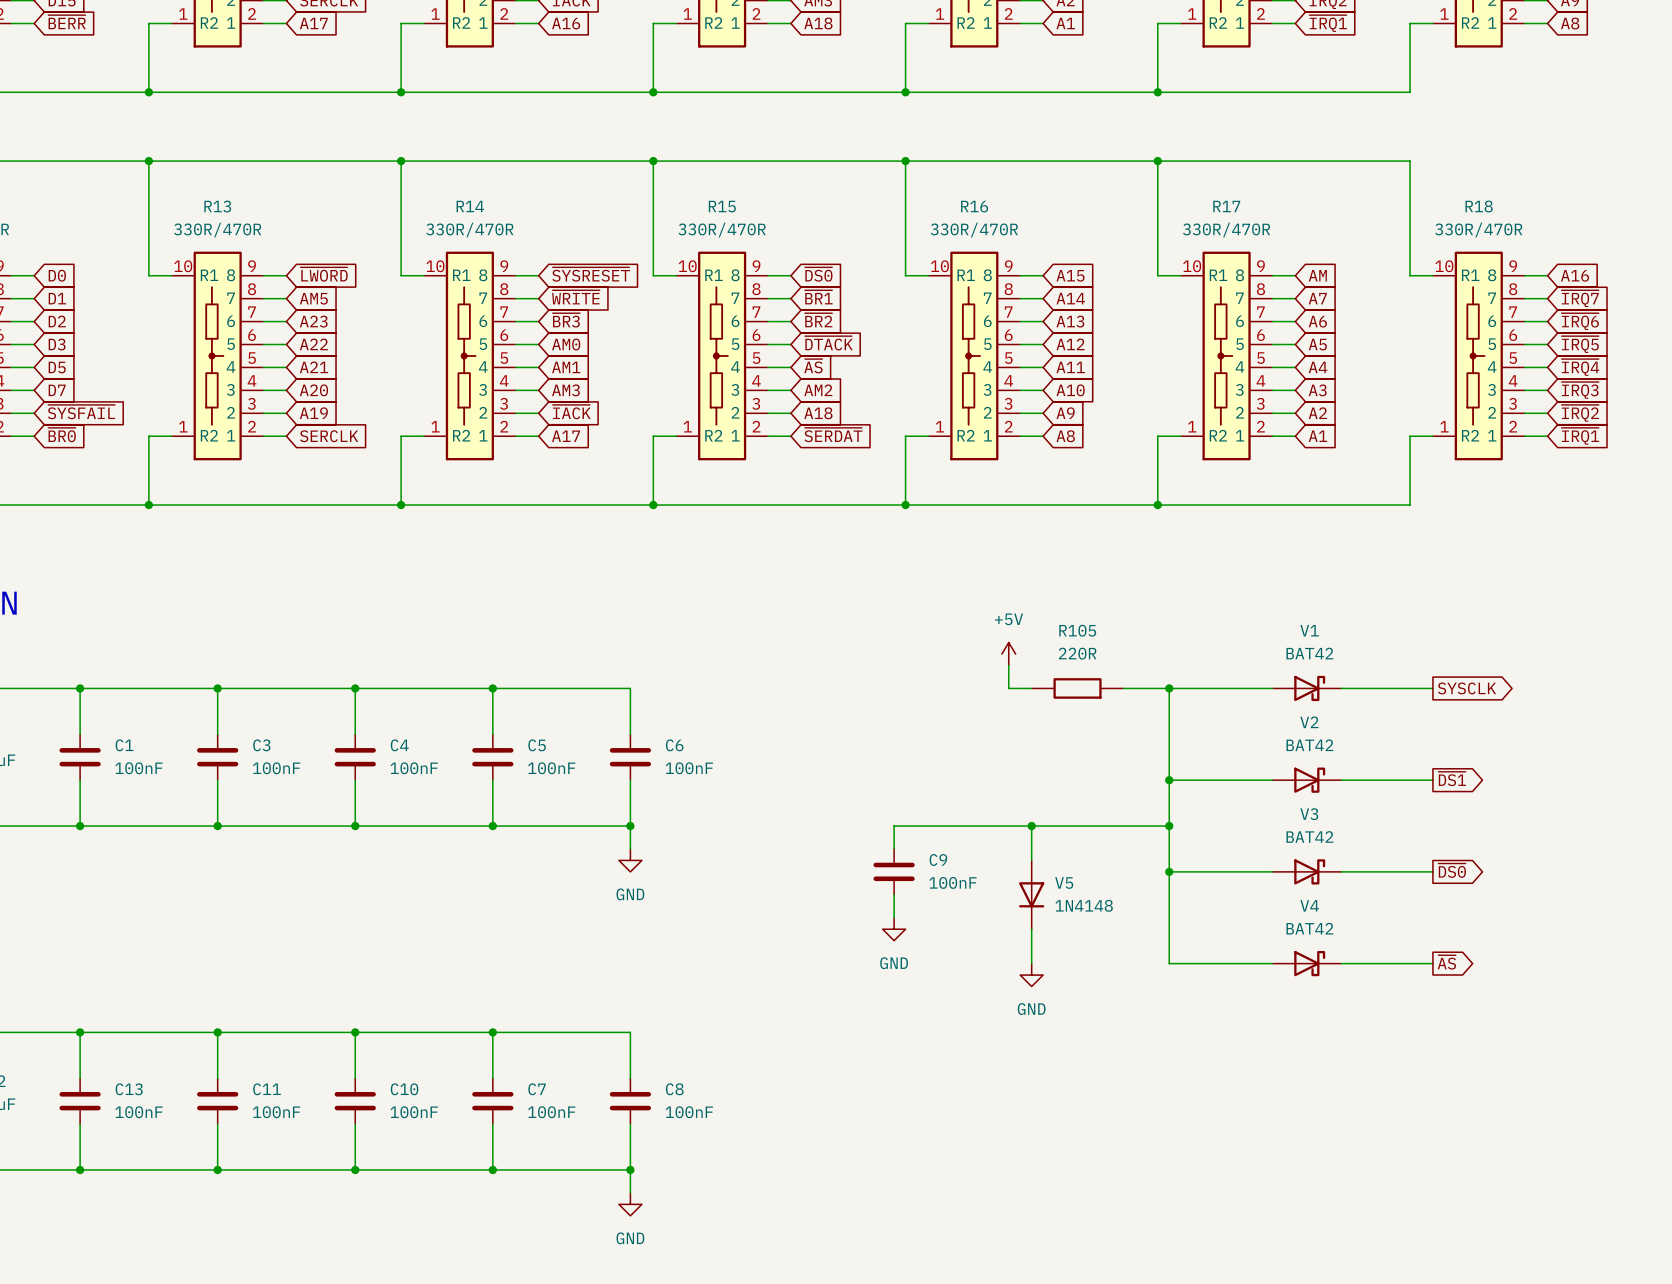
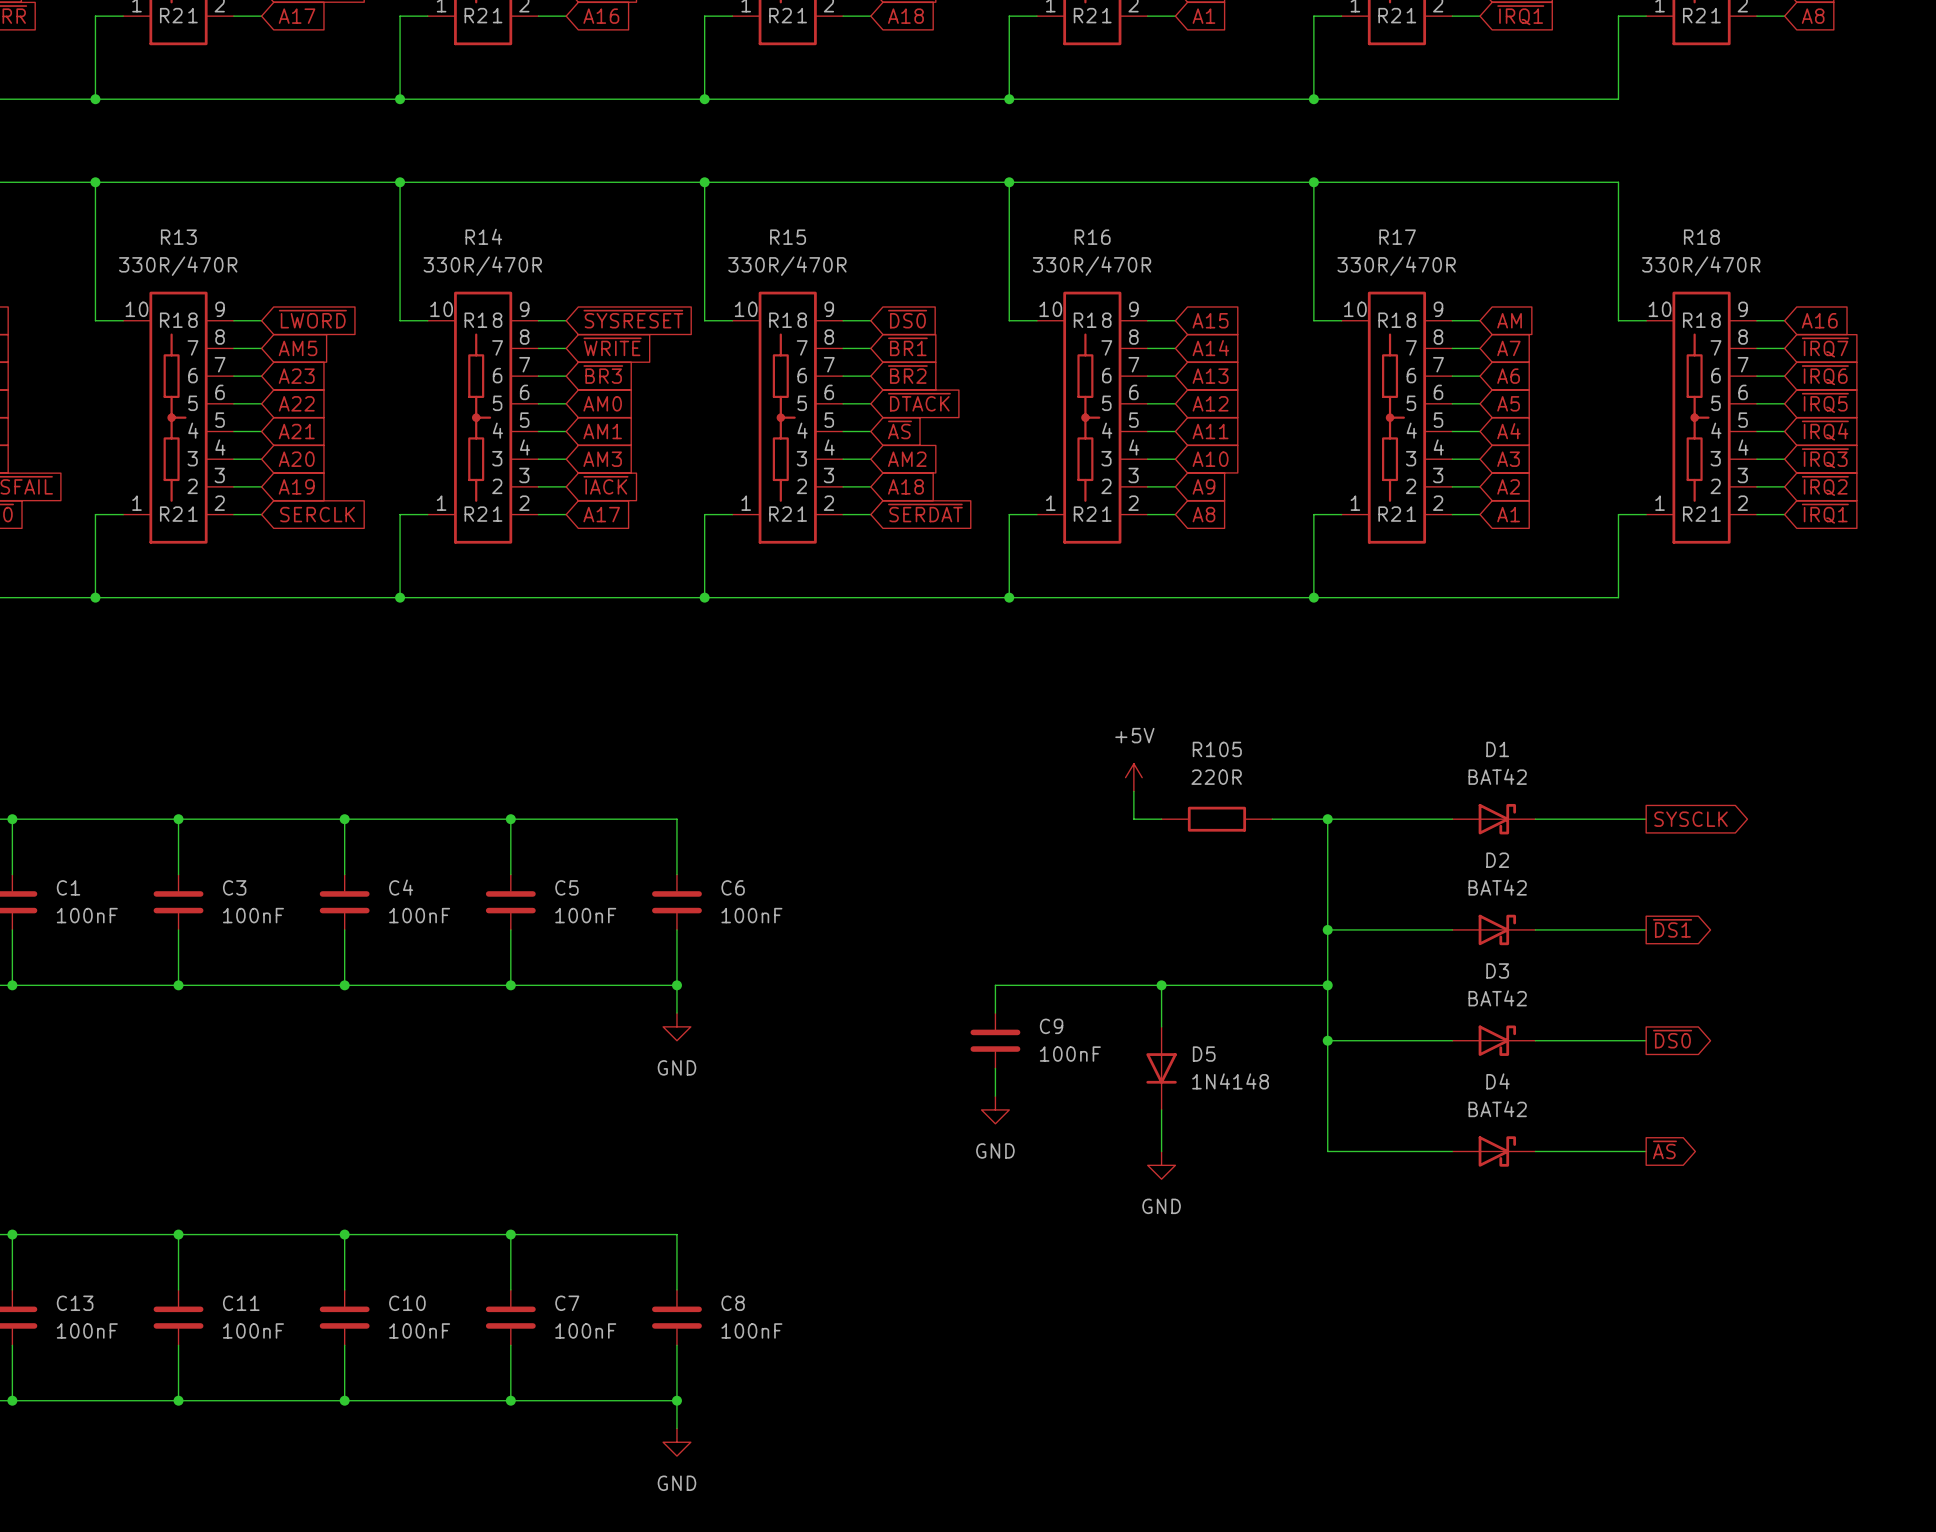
V1 name: V1 (1309, 630) -> D1 (1497, 749)
V2 name: V2 (1309, 722) -> D2 (1497, 860)
V3 name: V3 (1309, 814) -> D3 (1497, 970)
V5 name: V5 (1064, 883) -> D5 (1204, 1054)
V4 name: V4 (1309, 905) -> D4 (1497, 1081)

